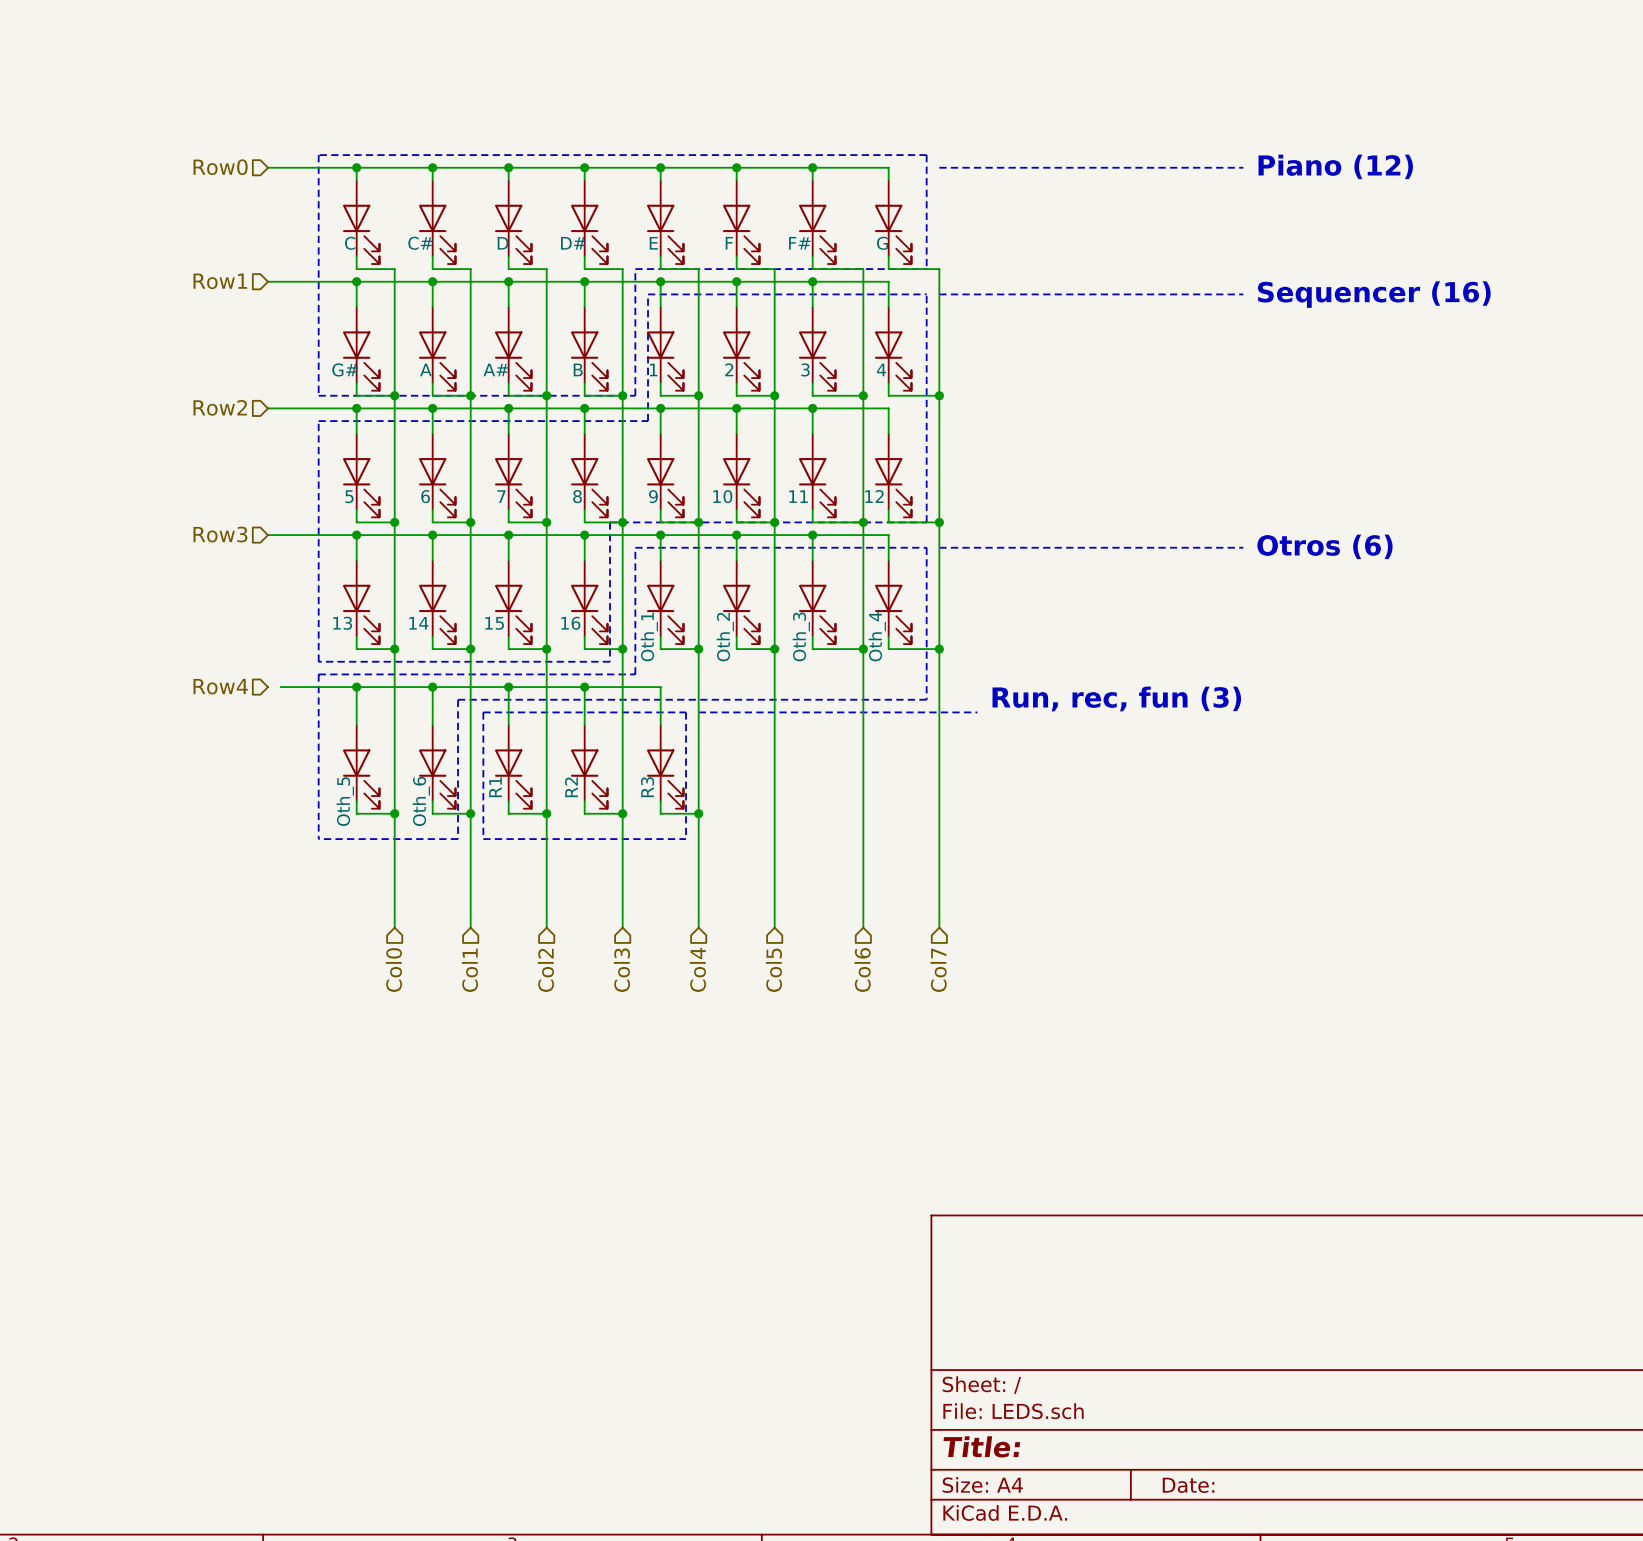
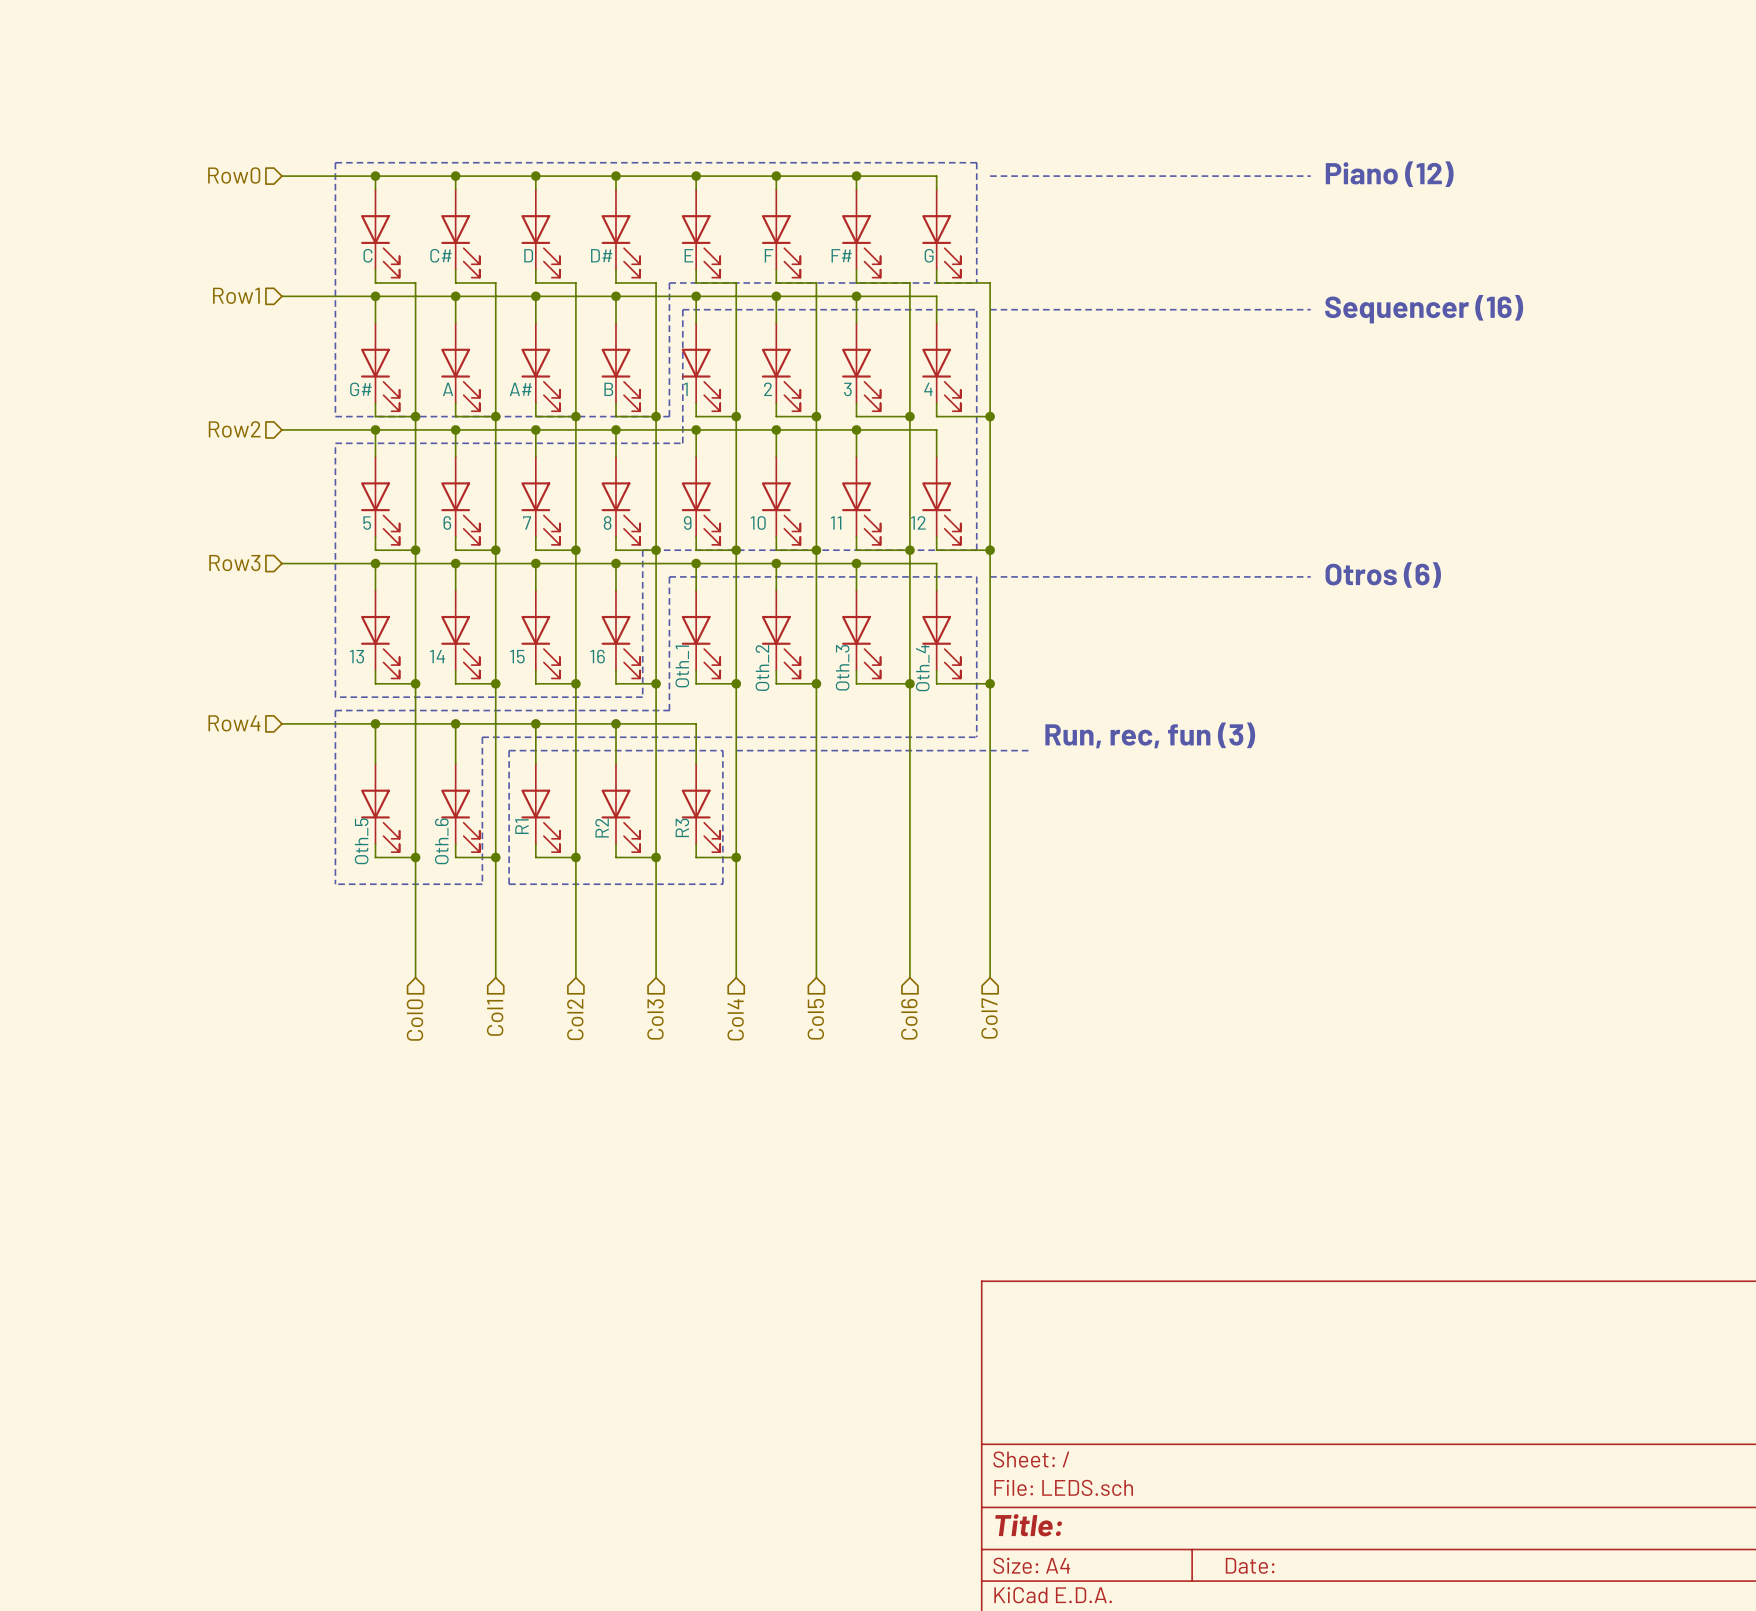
wire: none -> (281, 723) (295, 723)

